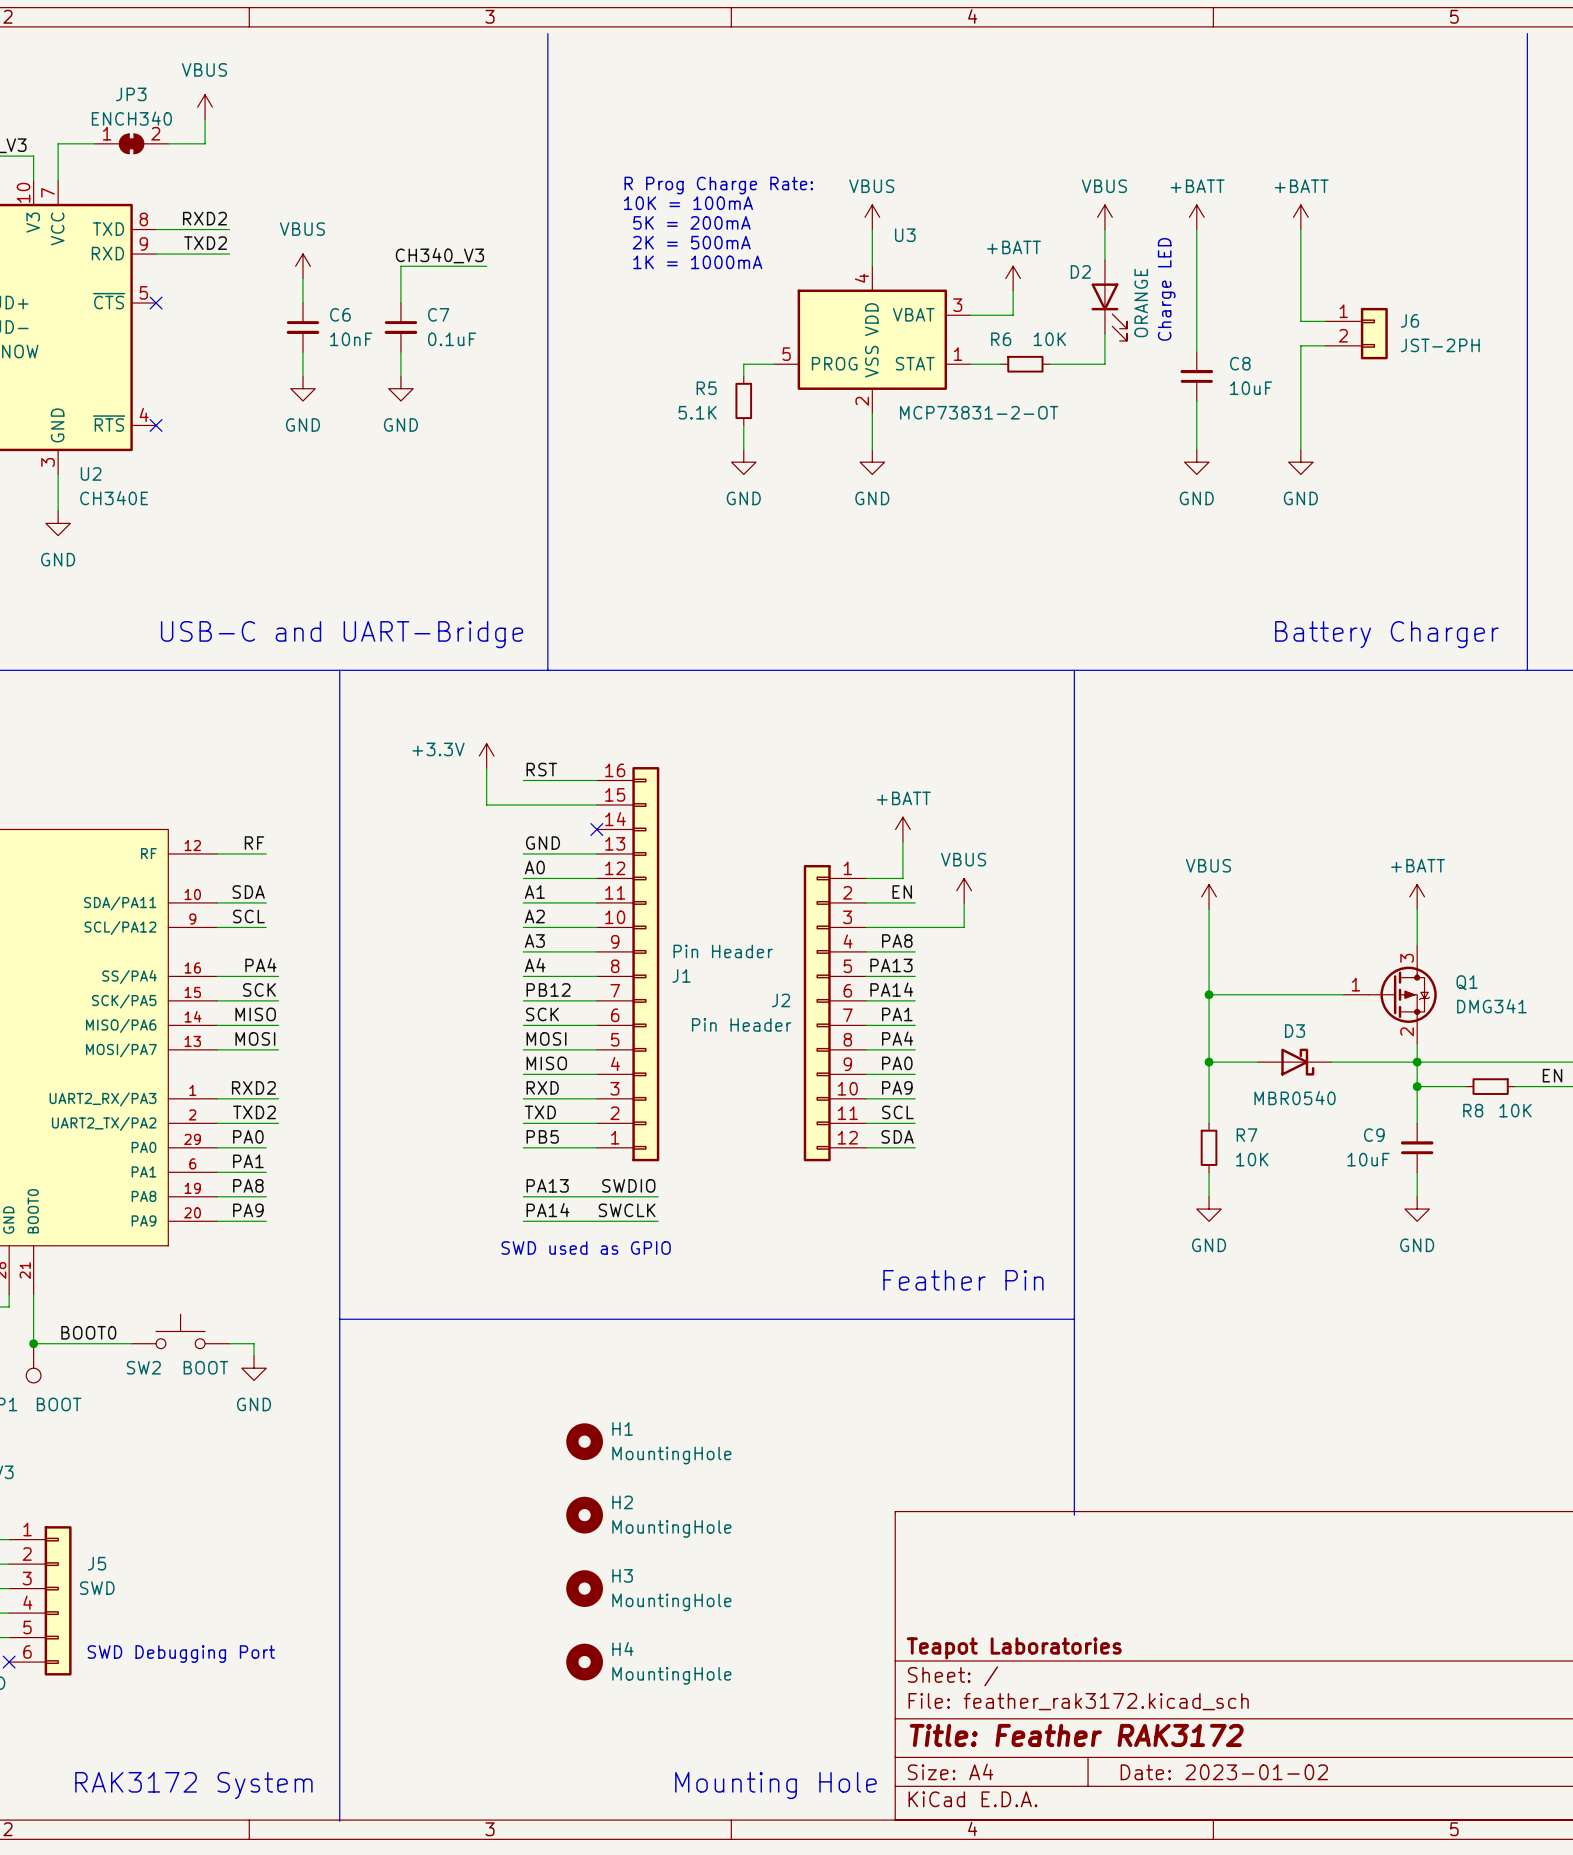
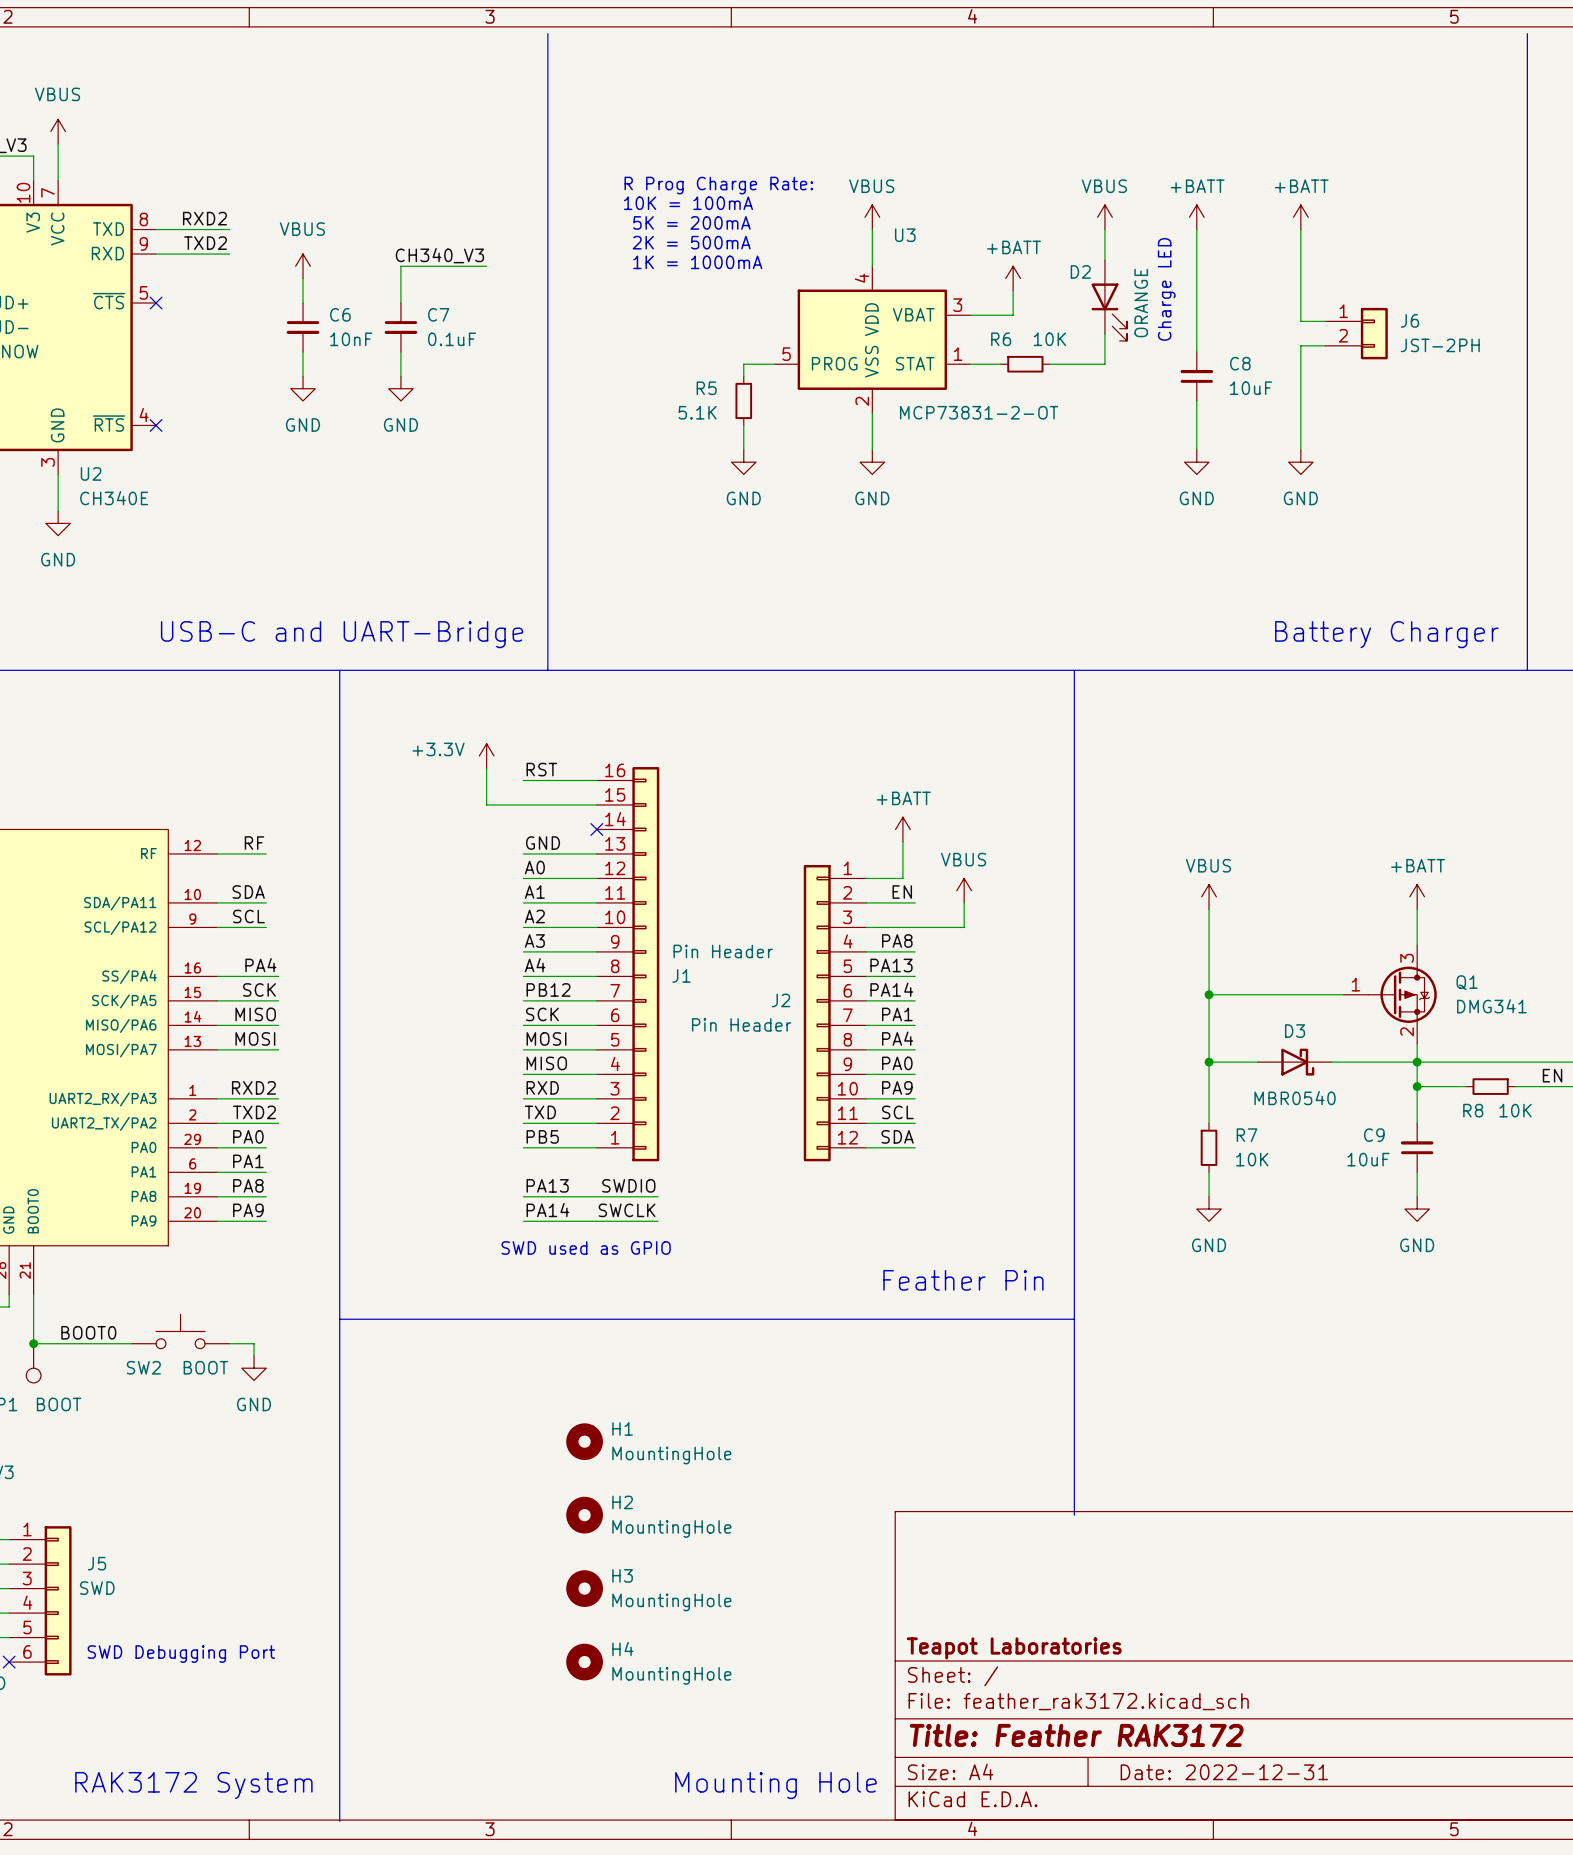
power symbol position: VBUS (205, 107) -> VBUS (58, 131)
wire: (205, 119) (205, 143) (168, 143) -> none
wire: (58, 143) (94, 143) -> none
JP3: ENCH340 (131, 143) -> none
title block: Date: 2023-01-02 (1224, 1772) -> Date: 2022-12-31 (1224, 1772)

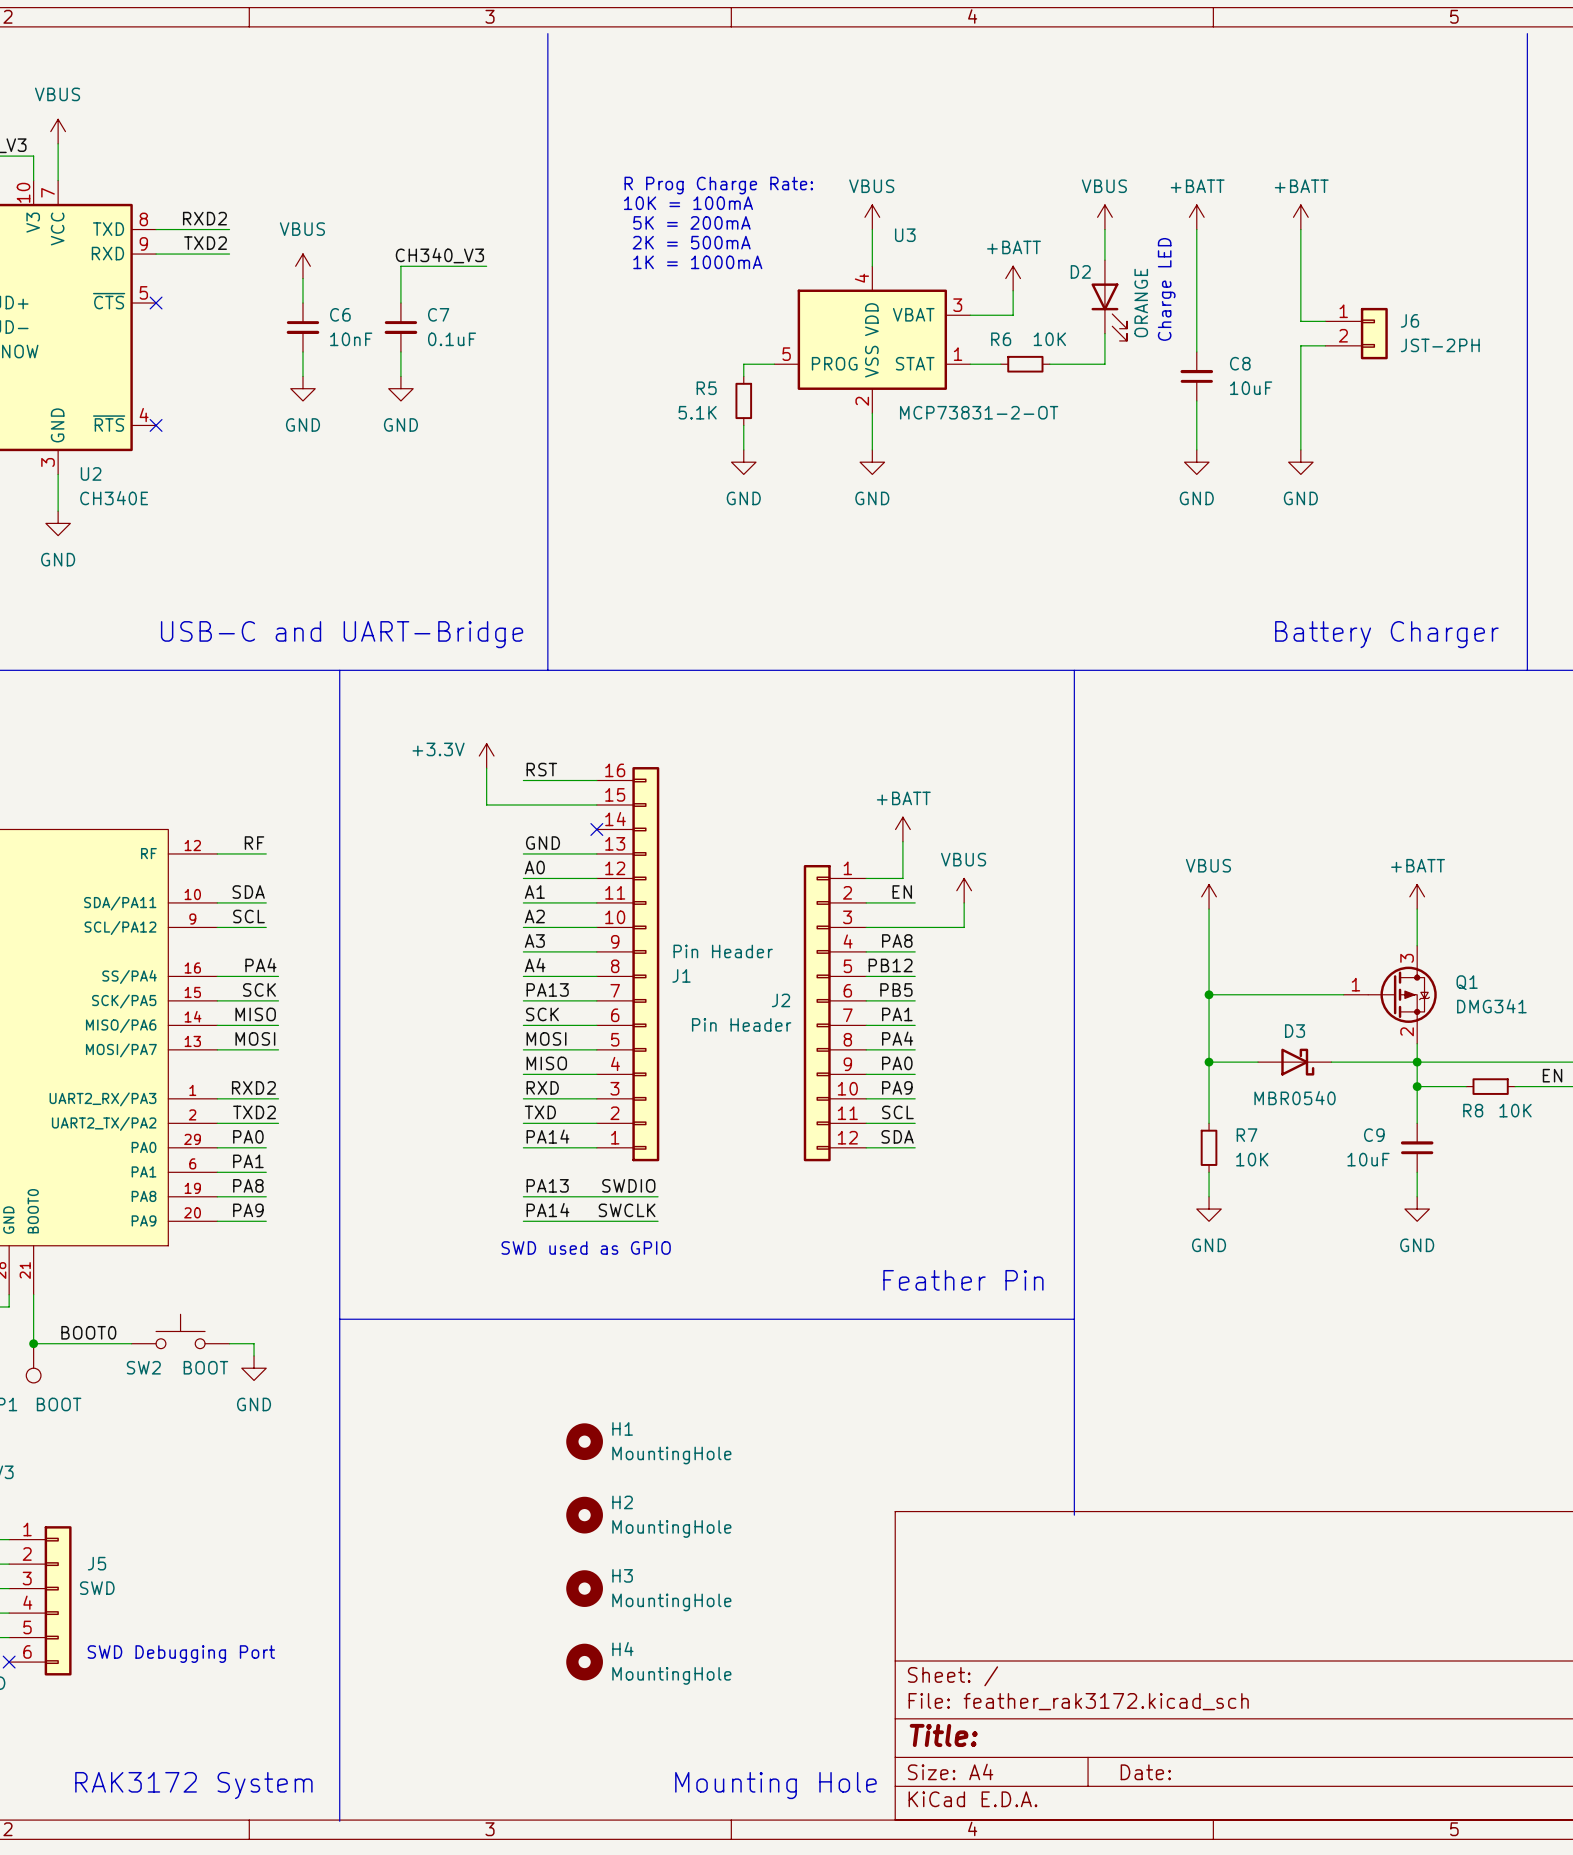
label: PA13 (891, 965) -> PB12 (890, 965)
label: PB12 (548, 989) -> PA13 (547, 989)
label: PA14 (891, 989) -> PB5 (896, 989)
label: PB5 (542, 1136) -> PA14 (547, 1136)
title block: Teapot Laboratories (1014, 1648) -> none
title block: Title: Feather RAK3172 (1076, 1735) -> Title: (943, 1735)
title block: Date: 2022-12-31 (1224, 1772) -> Date: (1145, 1772)

